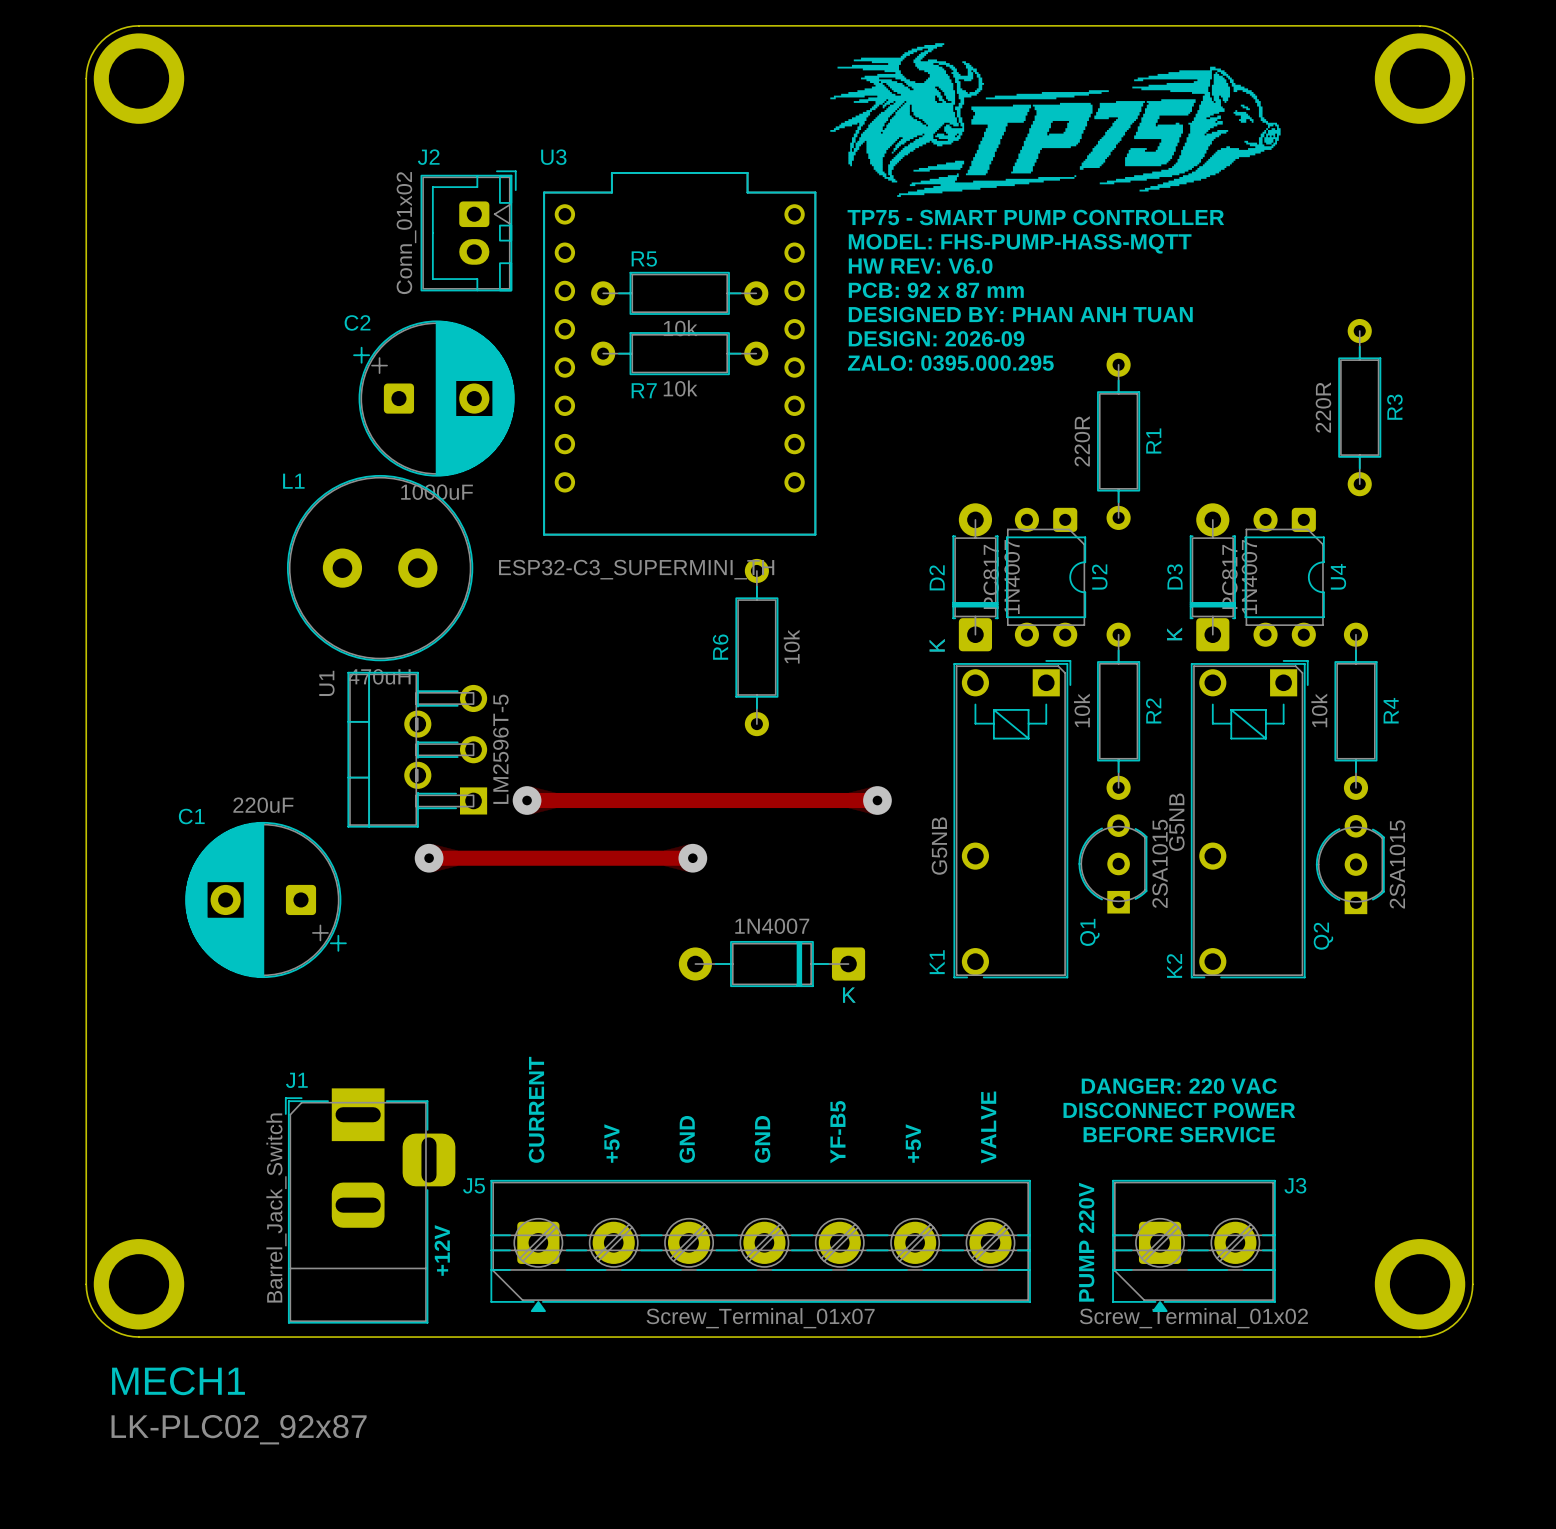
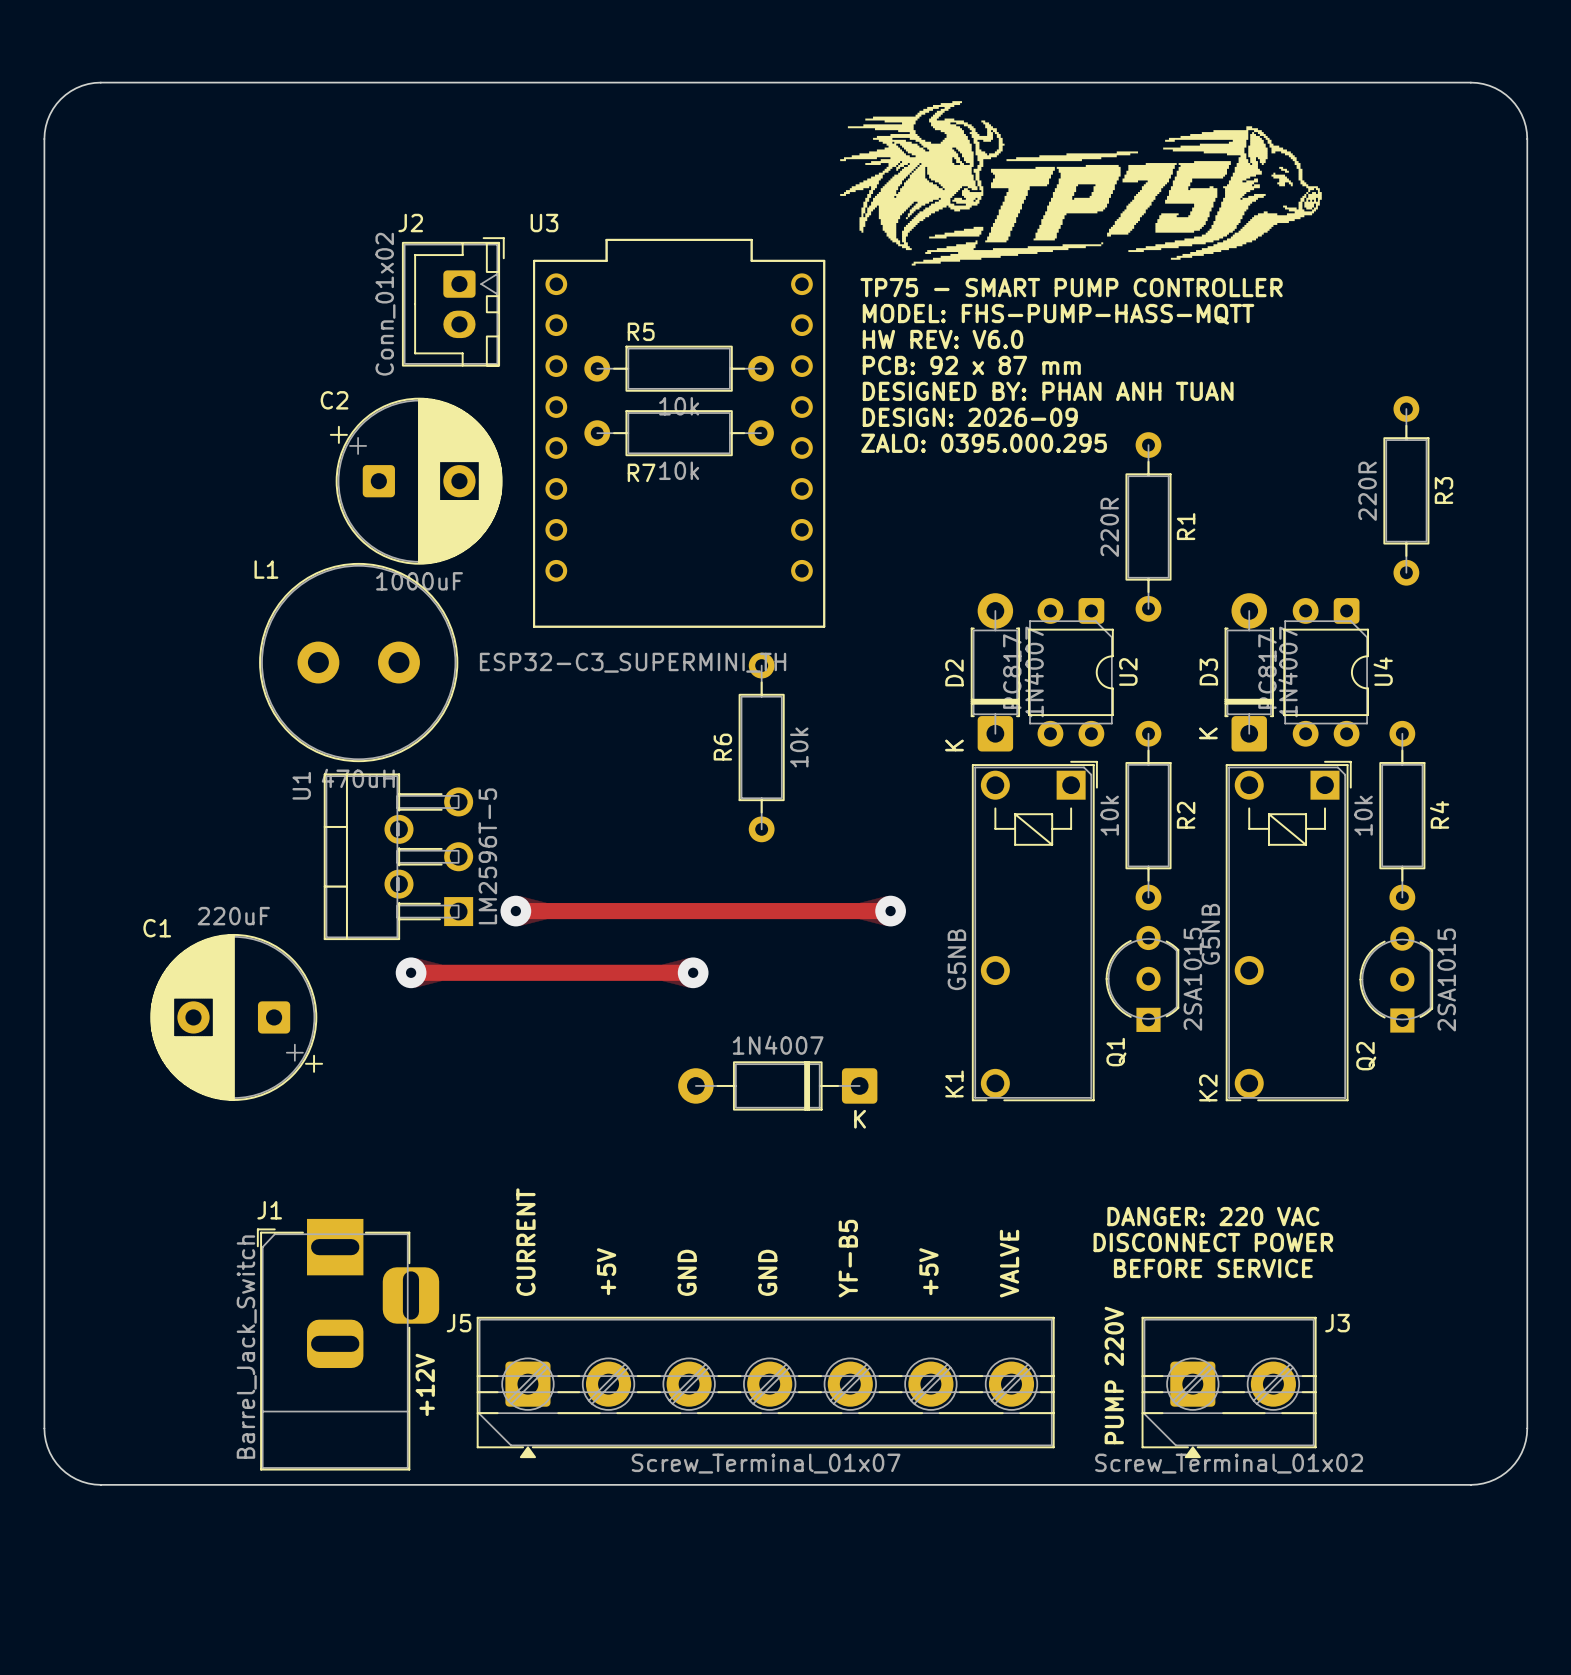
MECH1: LK-PLC02_92x87 (779, 681) -> none

